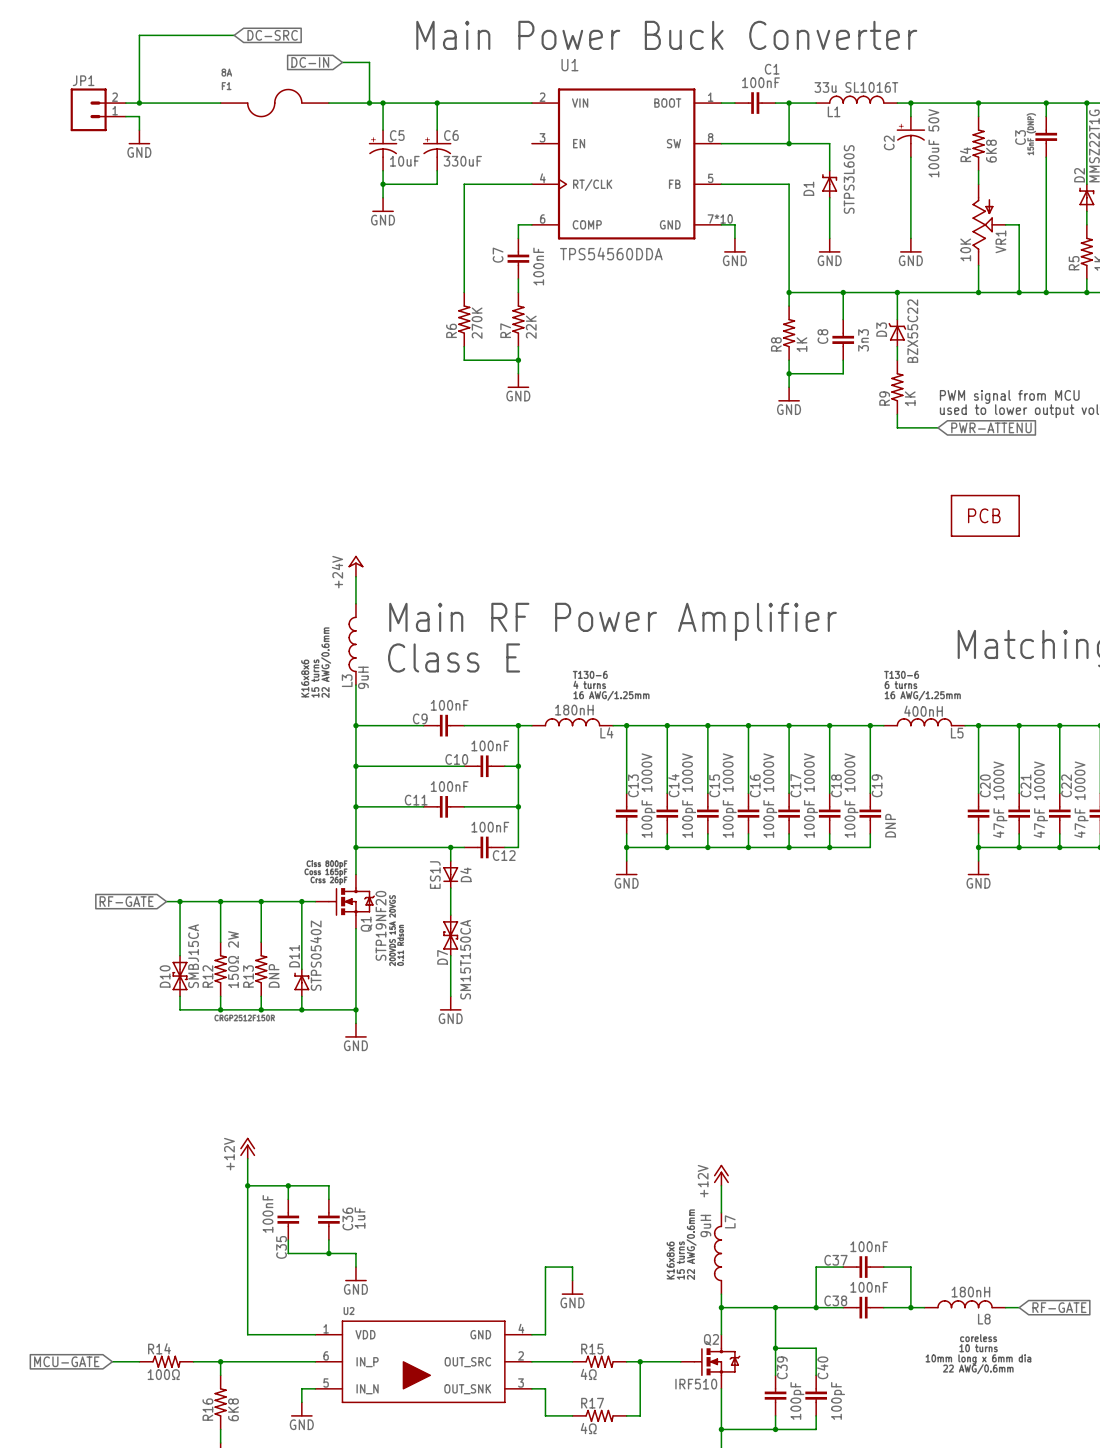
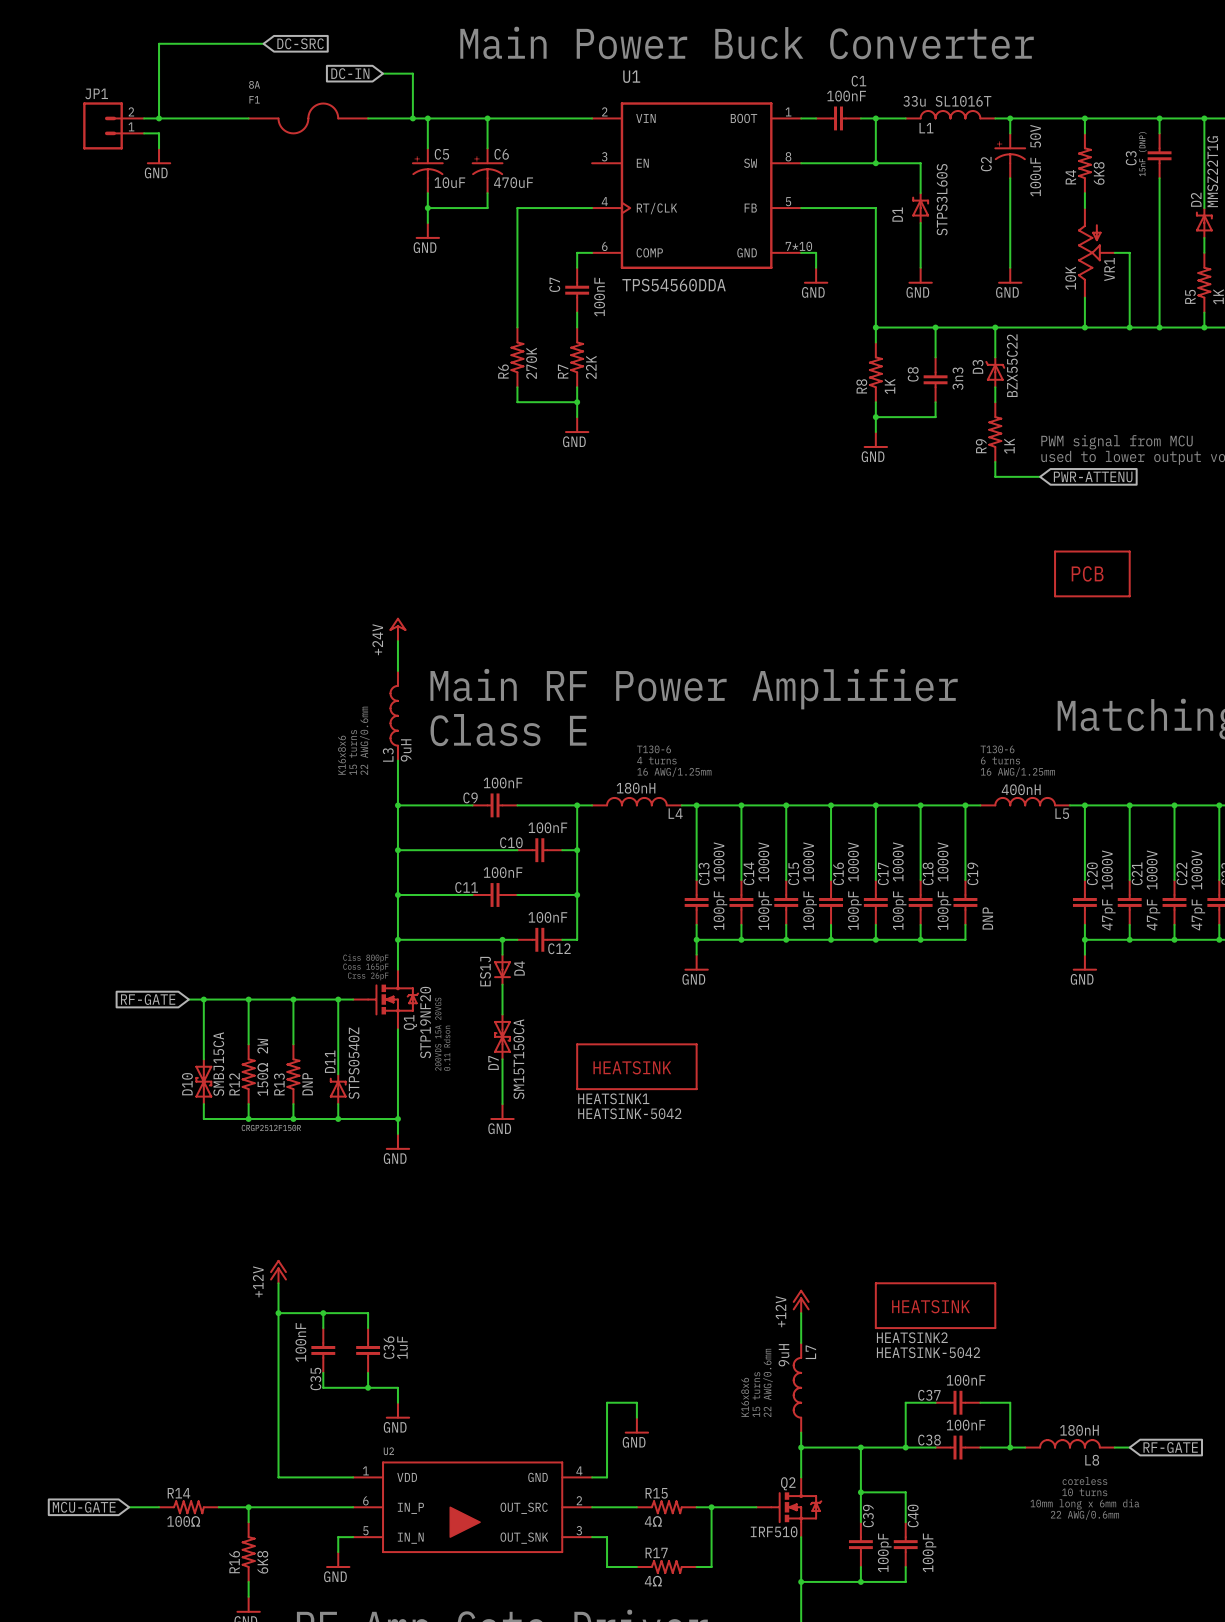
C6 value: 330uF (462, 161) -> 470uF (513, 182)
HEATSINK1: none -> HEATSINK-5042 (636, 1066)
HEATSINK2: none -> HEATSINK-5042 (935, 1305)

